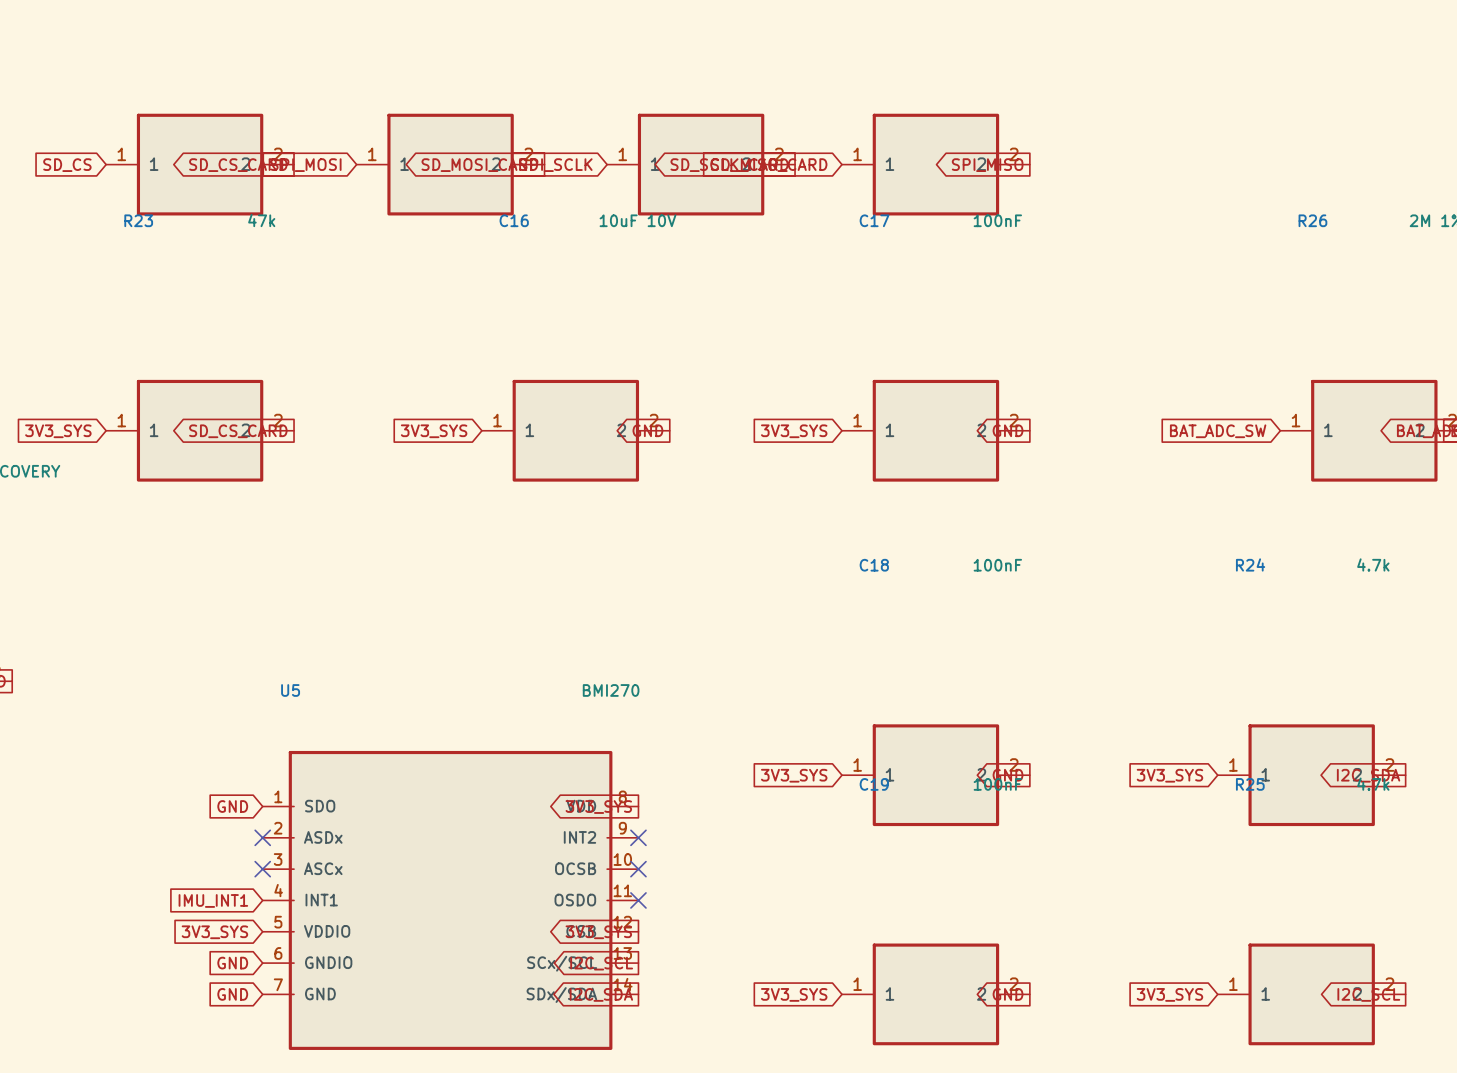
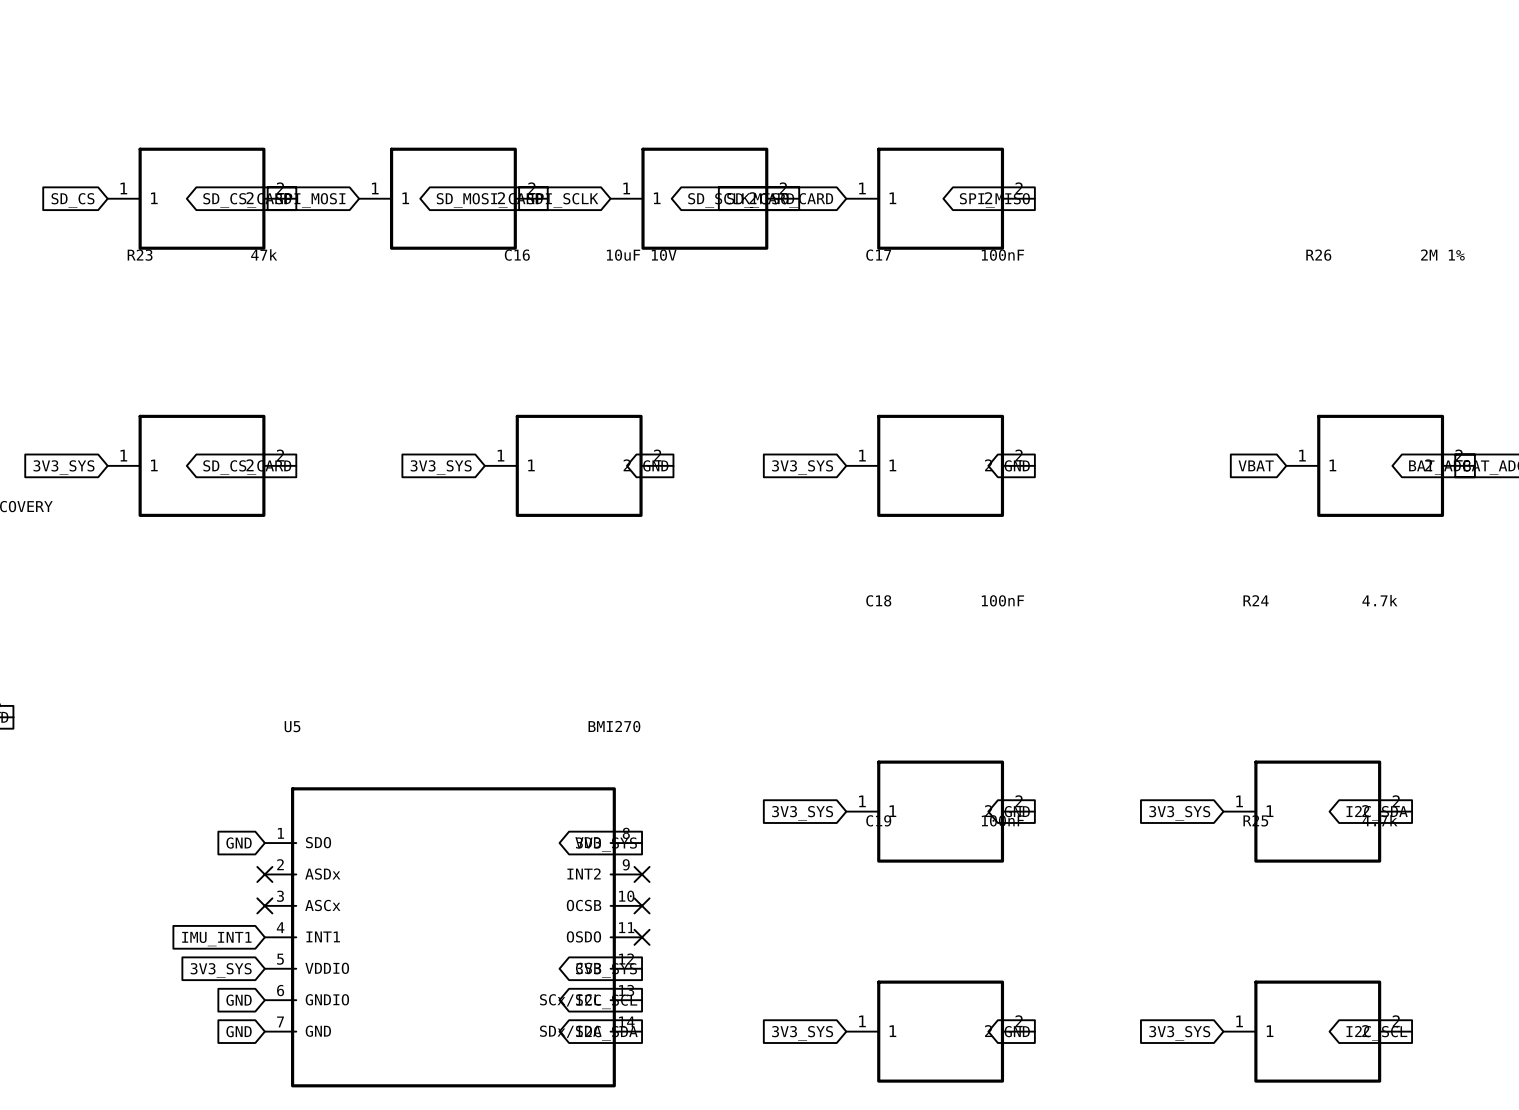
global label: BAT_ADC_SW (1218, 431) -> VBAT (1256, 465)

